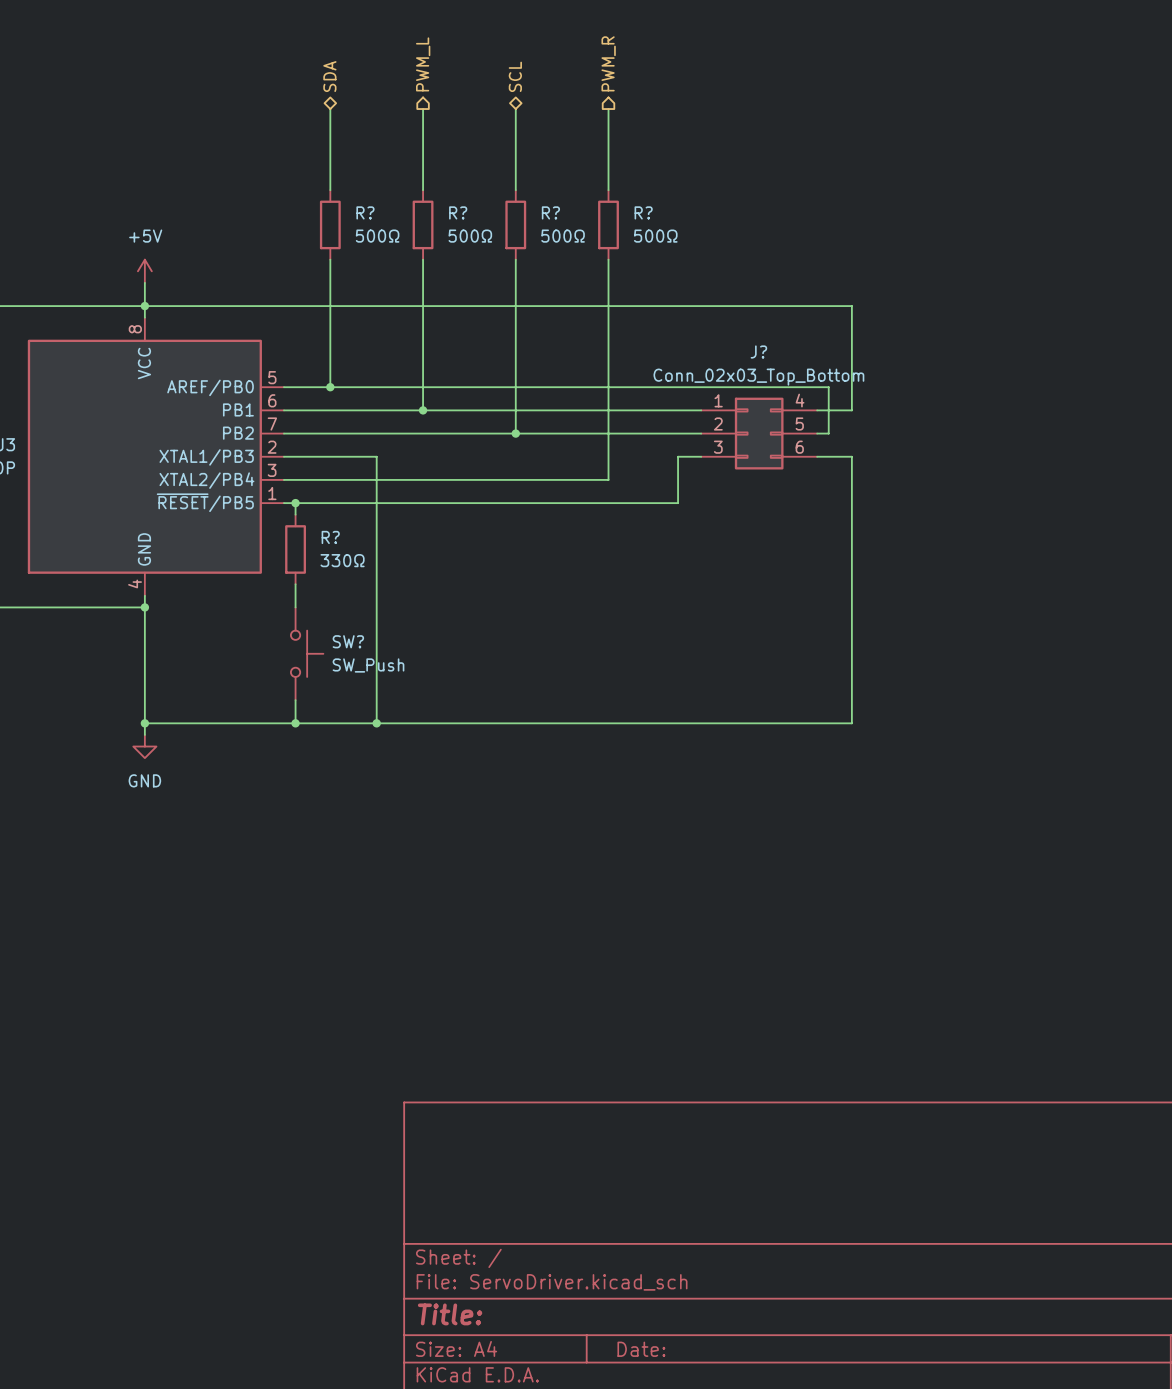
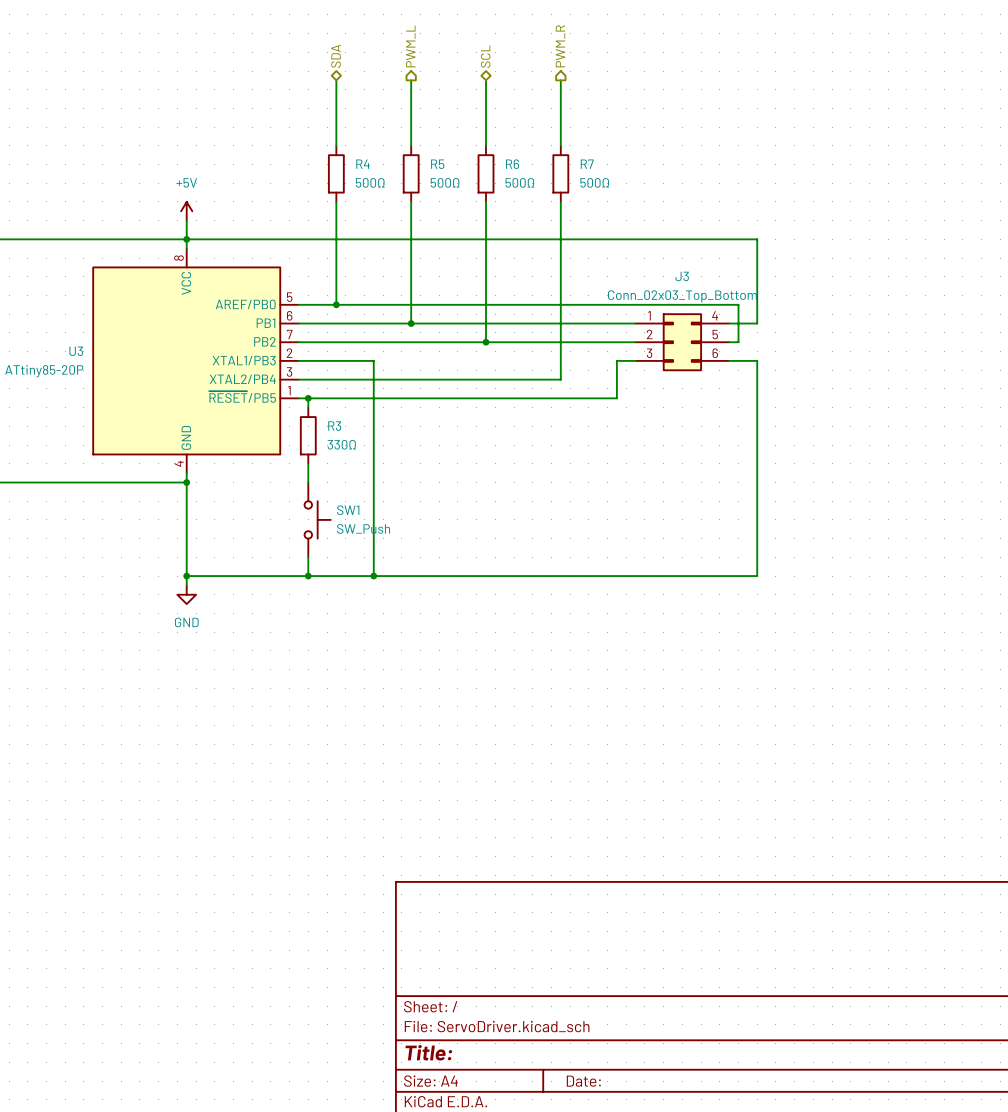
R? name: R? (365, 212) -> R4 (363, 164)
R? name: R? (458, 212) -> R5 (437, 164)
R? name: R? (550, 212) -> R6 (512, 164)
R? name: R? (643, 212) -> R7 (587, 164)
J? name: J? (758, 352) -> J3 (682, 276)
R? name: R? (330, 537) -> R3 (334, 426)
SW? name: SW? (348, 641) -> SW1 (348, 510)

